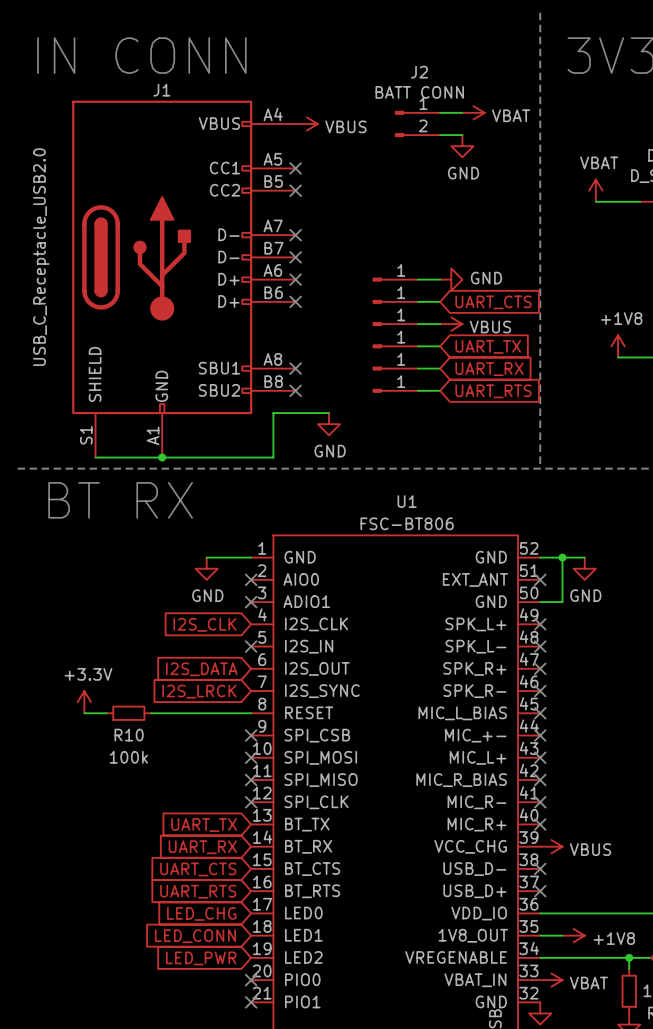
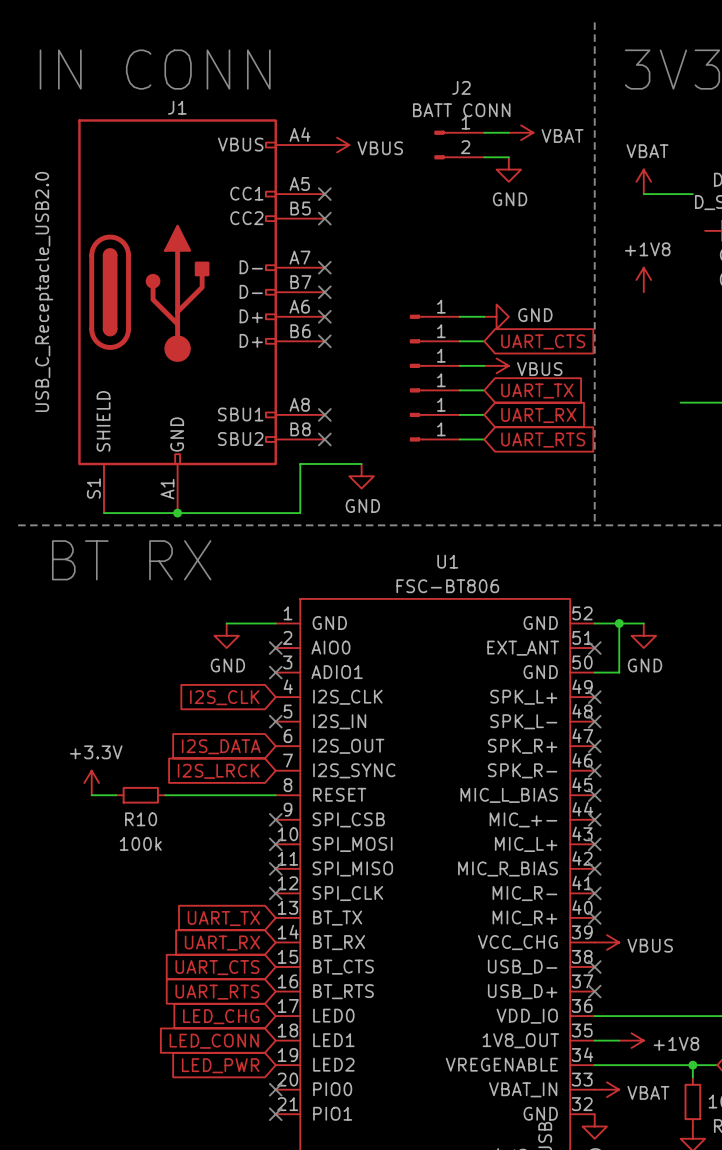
power symbol position: VBAT (595, 190) -> VBAT (643, 181)
wire: (595, 201) (640, 201) -> (643, 194) (692, 194)
power symbol position: +1V8 (618, 346) -> +1V8 (643, 279)

